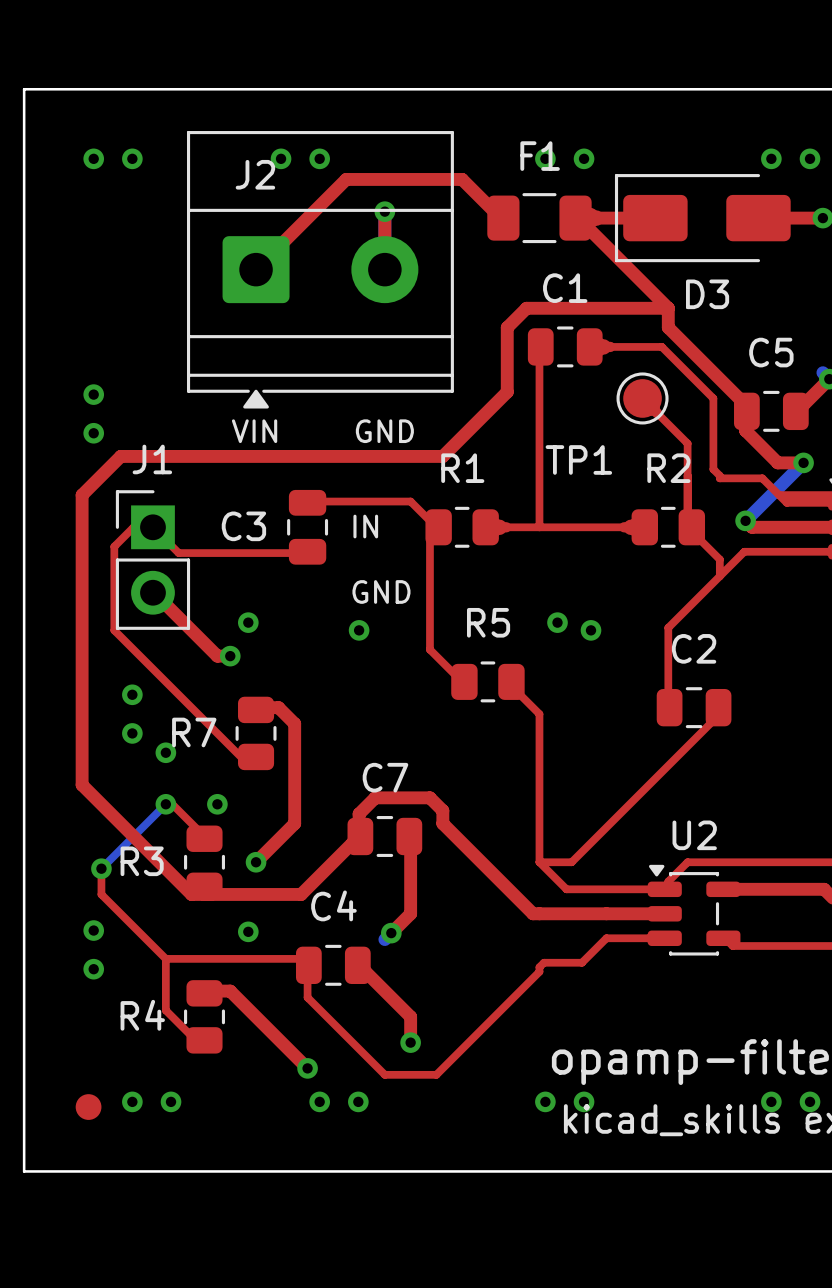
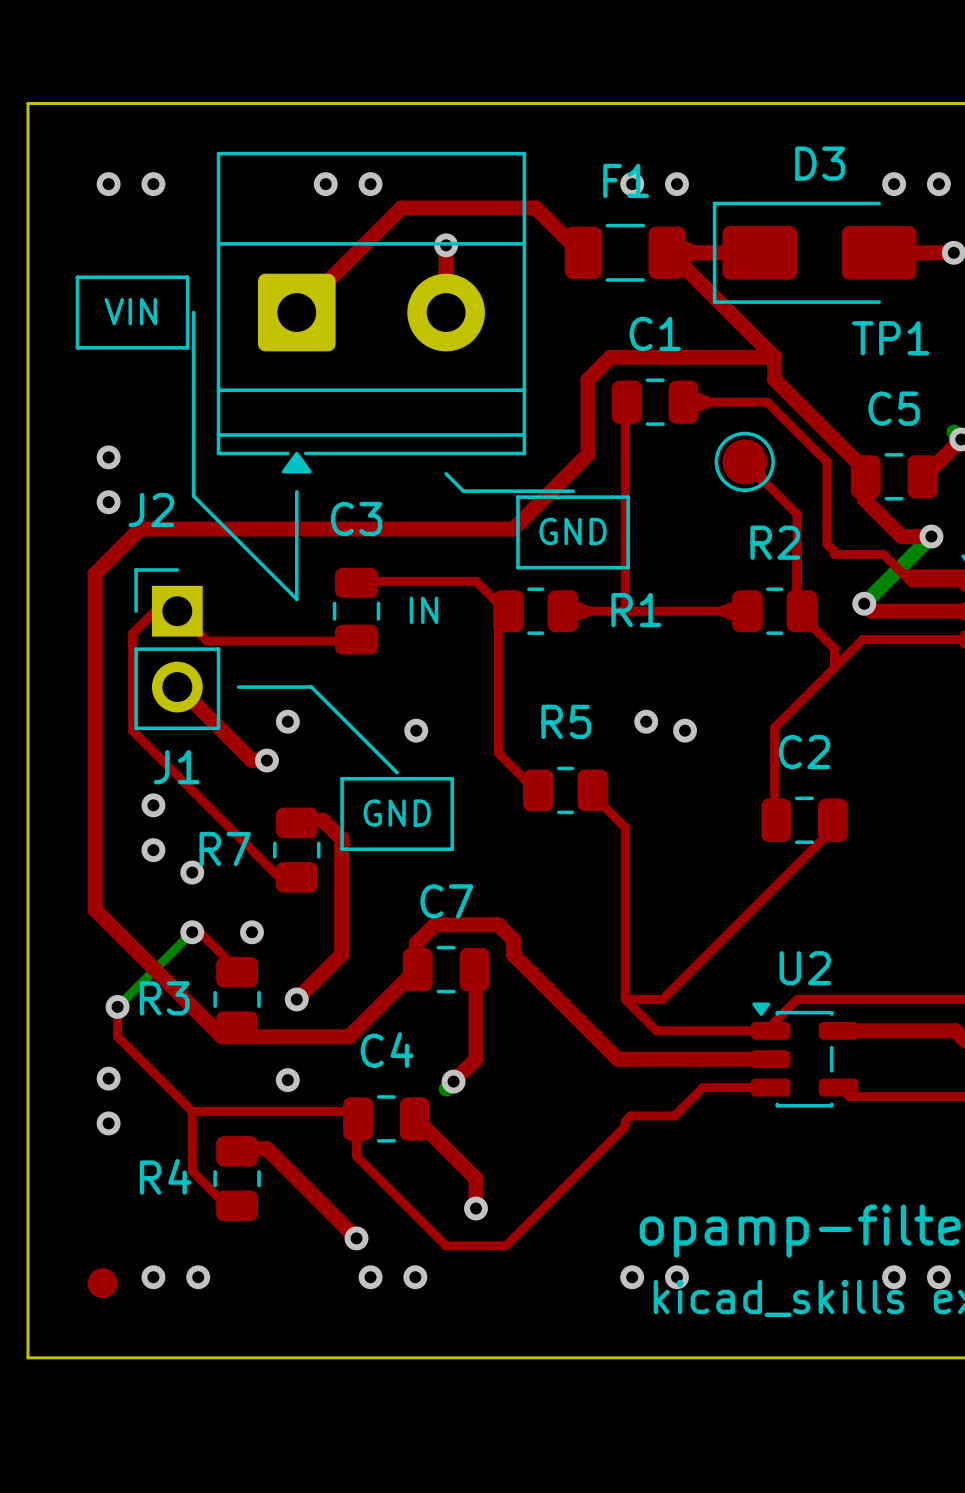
J2 name position: J2 (255, 174) -> J2 (151, 510)
line: none -> (77, 277) (187, 277) (187, 347) (77, 347) (77, 277)
line: none -> (193, 312) (193, 496) (296, 599) (296, 491)
D3 name position: D3 (707, 294) -> D3 (820, 163)
line: none -> (446, 473) (463, 491) (573, 491)
line: none -> (517, 497) (628, 497) (628, 567) (517, 567) (517, 497)
text position: VIN (254, 431) -> VIN (130, 311)
text: GND (384, 431) -> none
text: none -> GND (573, 531)
J1 name position: J1 (152, 459) -> J1 (176, 767)
TP1 name position: TP1 (578, 459) -> TP1 (890, 338)
R1 name position: R1 (462, 468) -> R1 (636, 610)
C3 name position: C3 (243, 526) -> C3 (356, 519)
text: GND (381, 591) -> none
line: none -> (238, 687) (311, 687) (397, 772)
line: none -> (342, 778) (452, 778) (452, 849) (342, 849) (342, 778)
text: none -> GND (397, 813)

